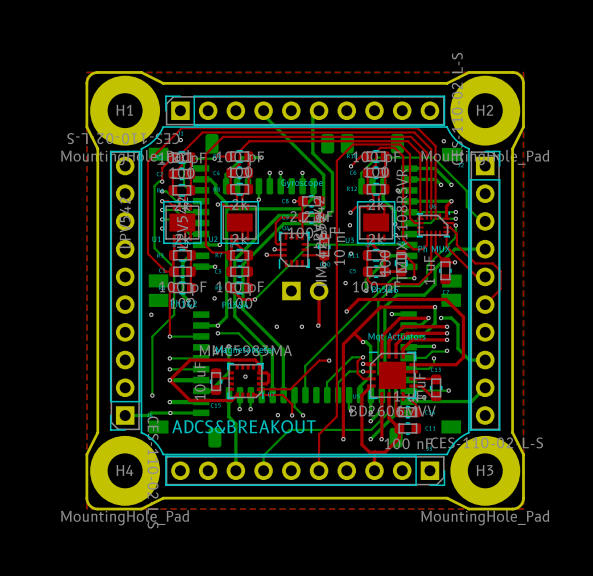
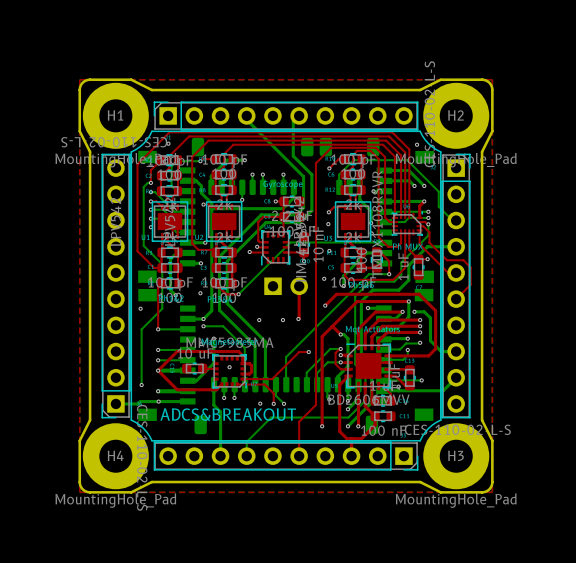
part rotation: 0° (216, 381) -> 90° clockwise (194, 368)

